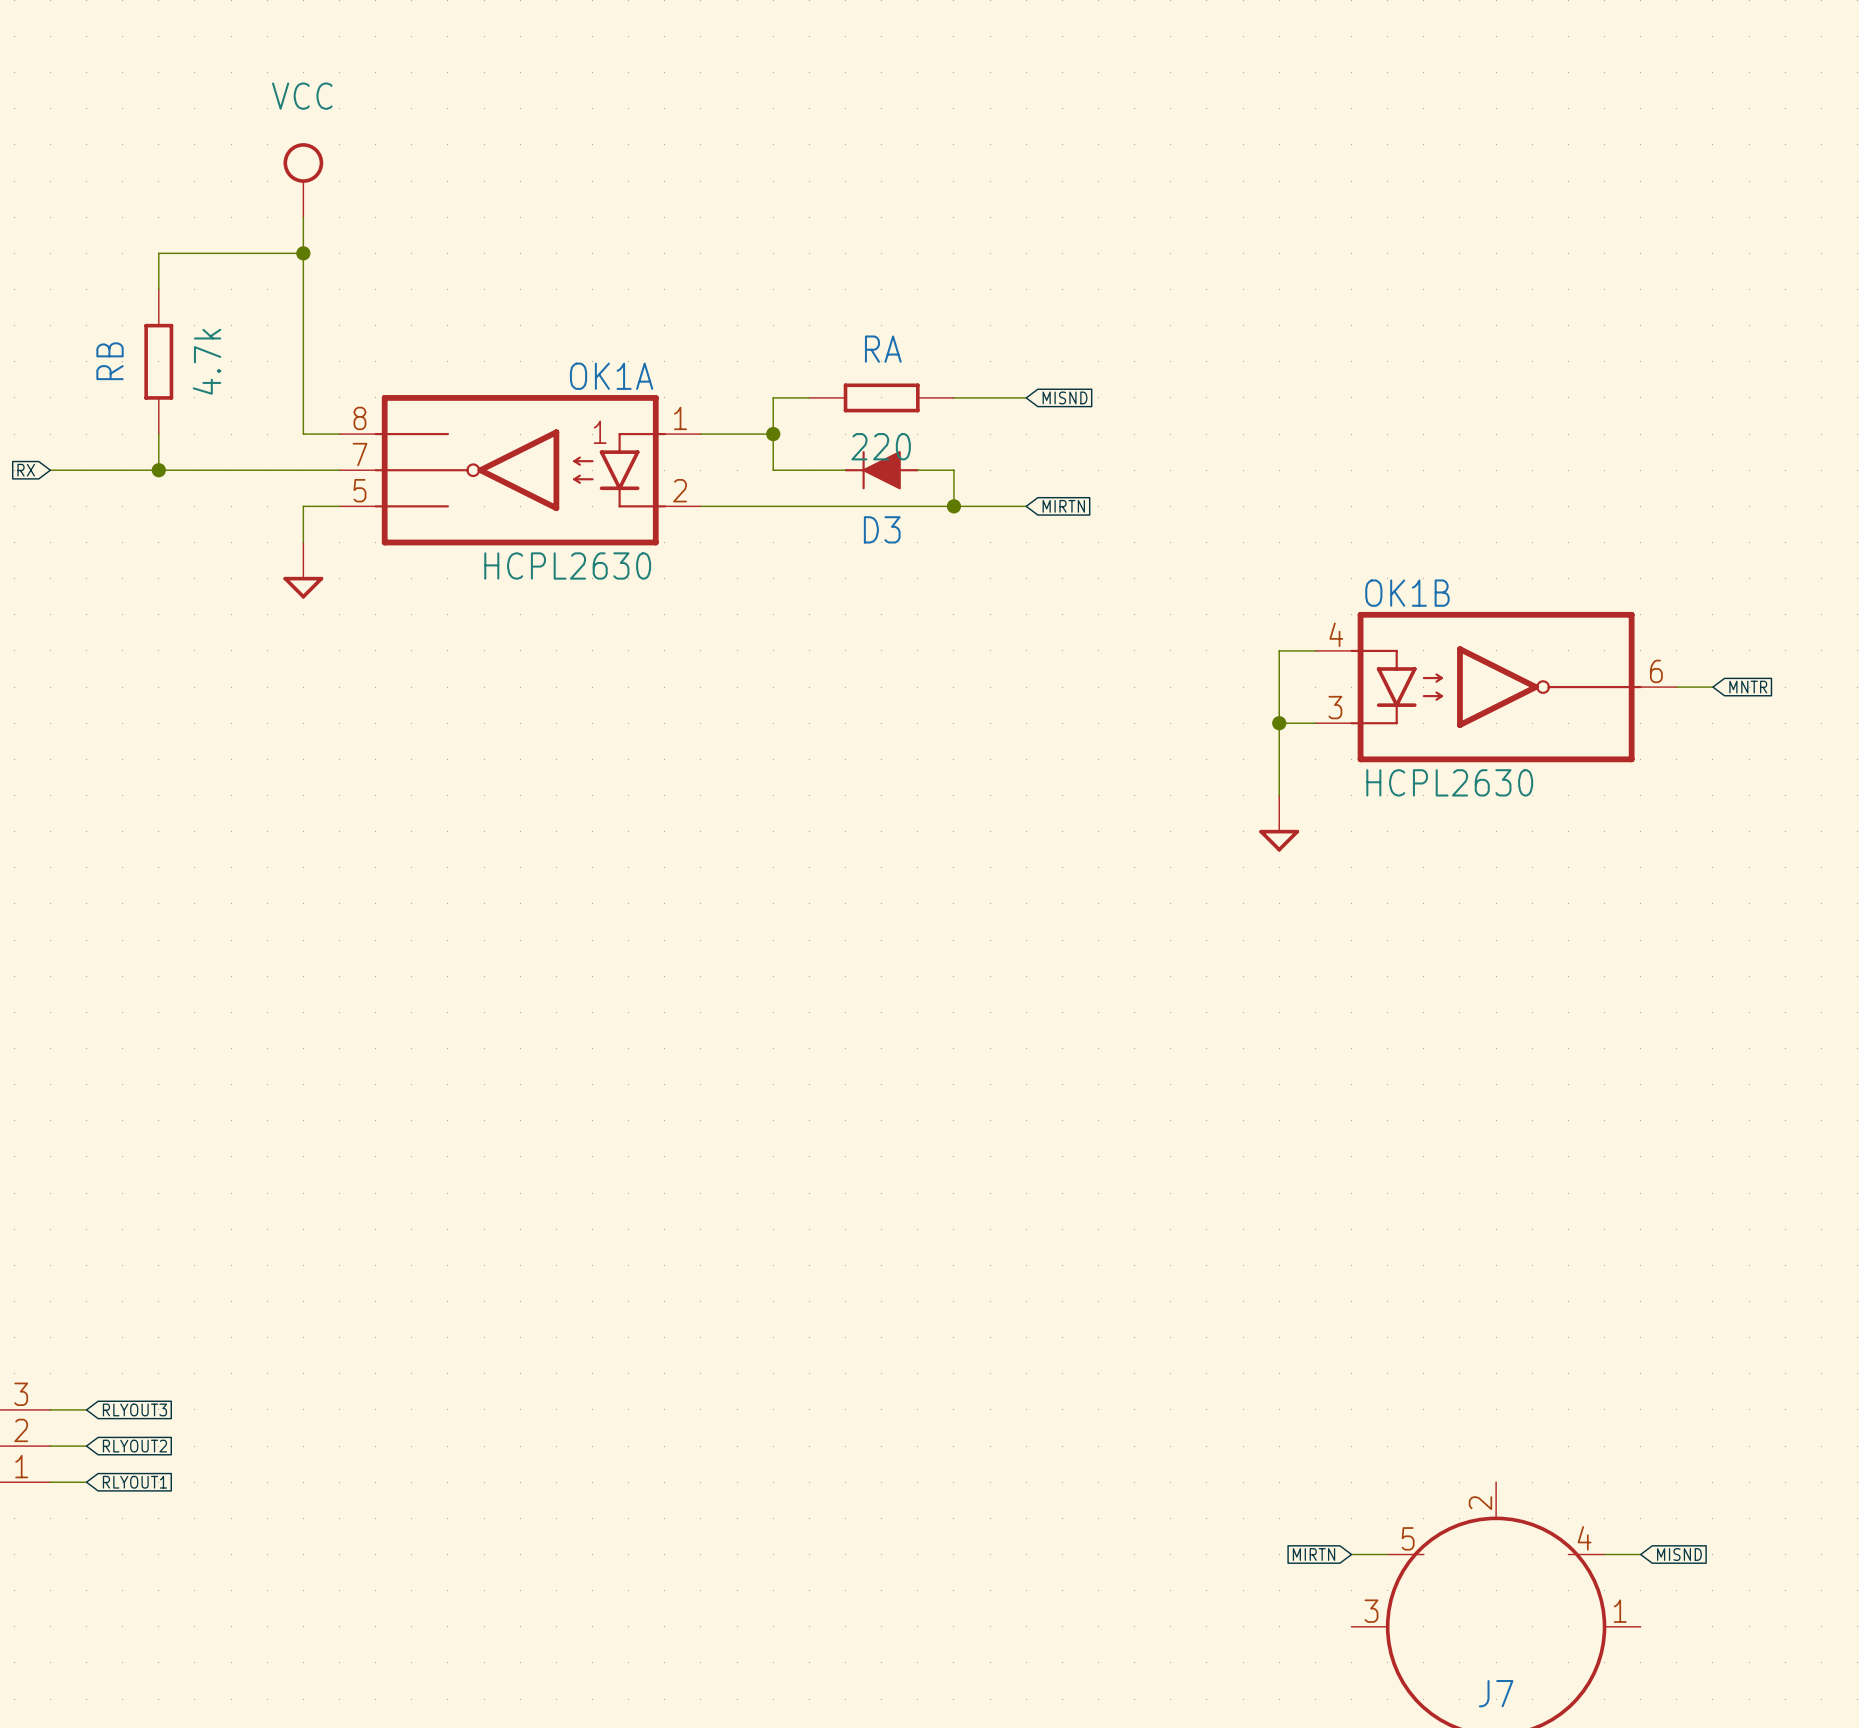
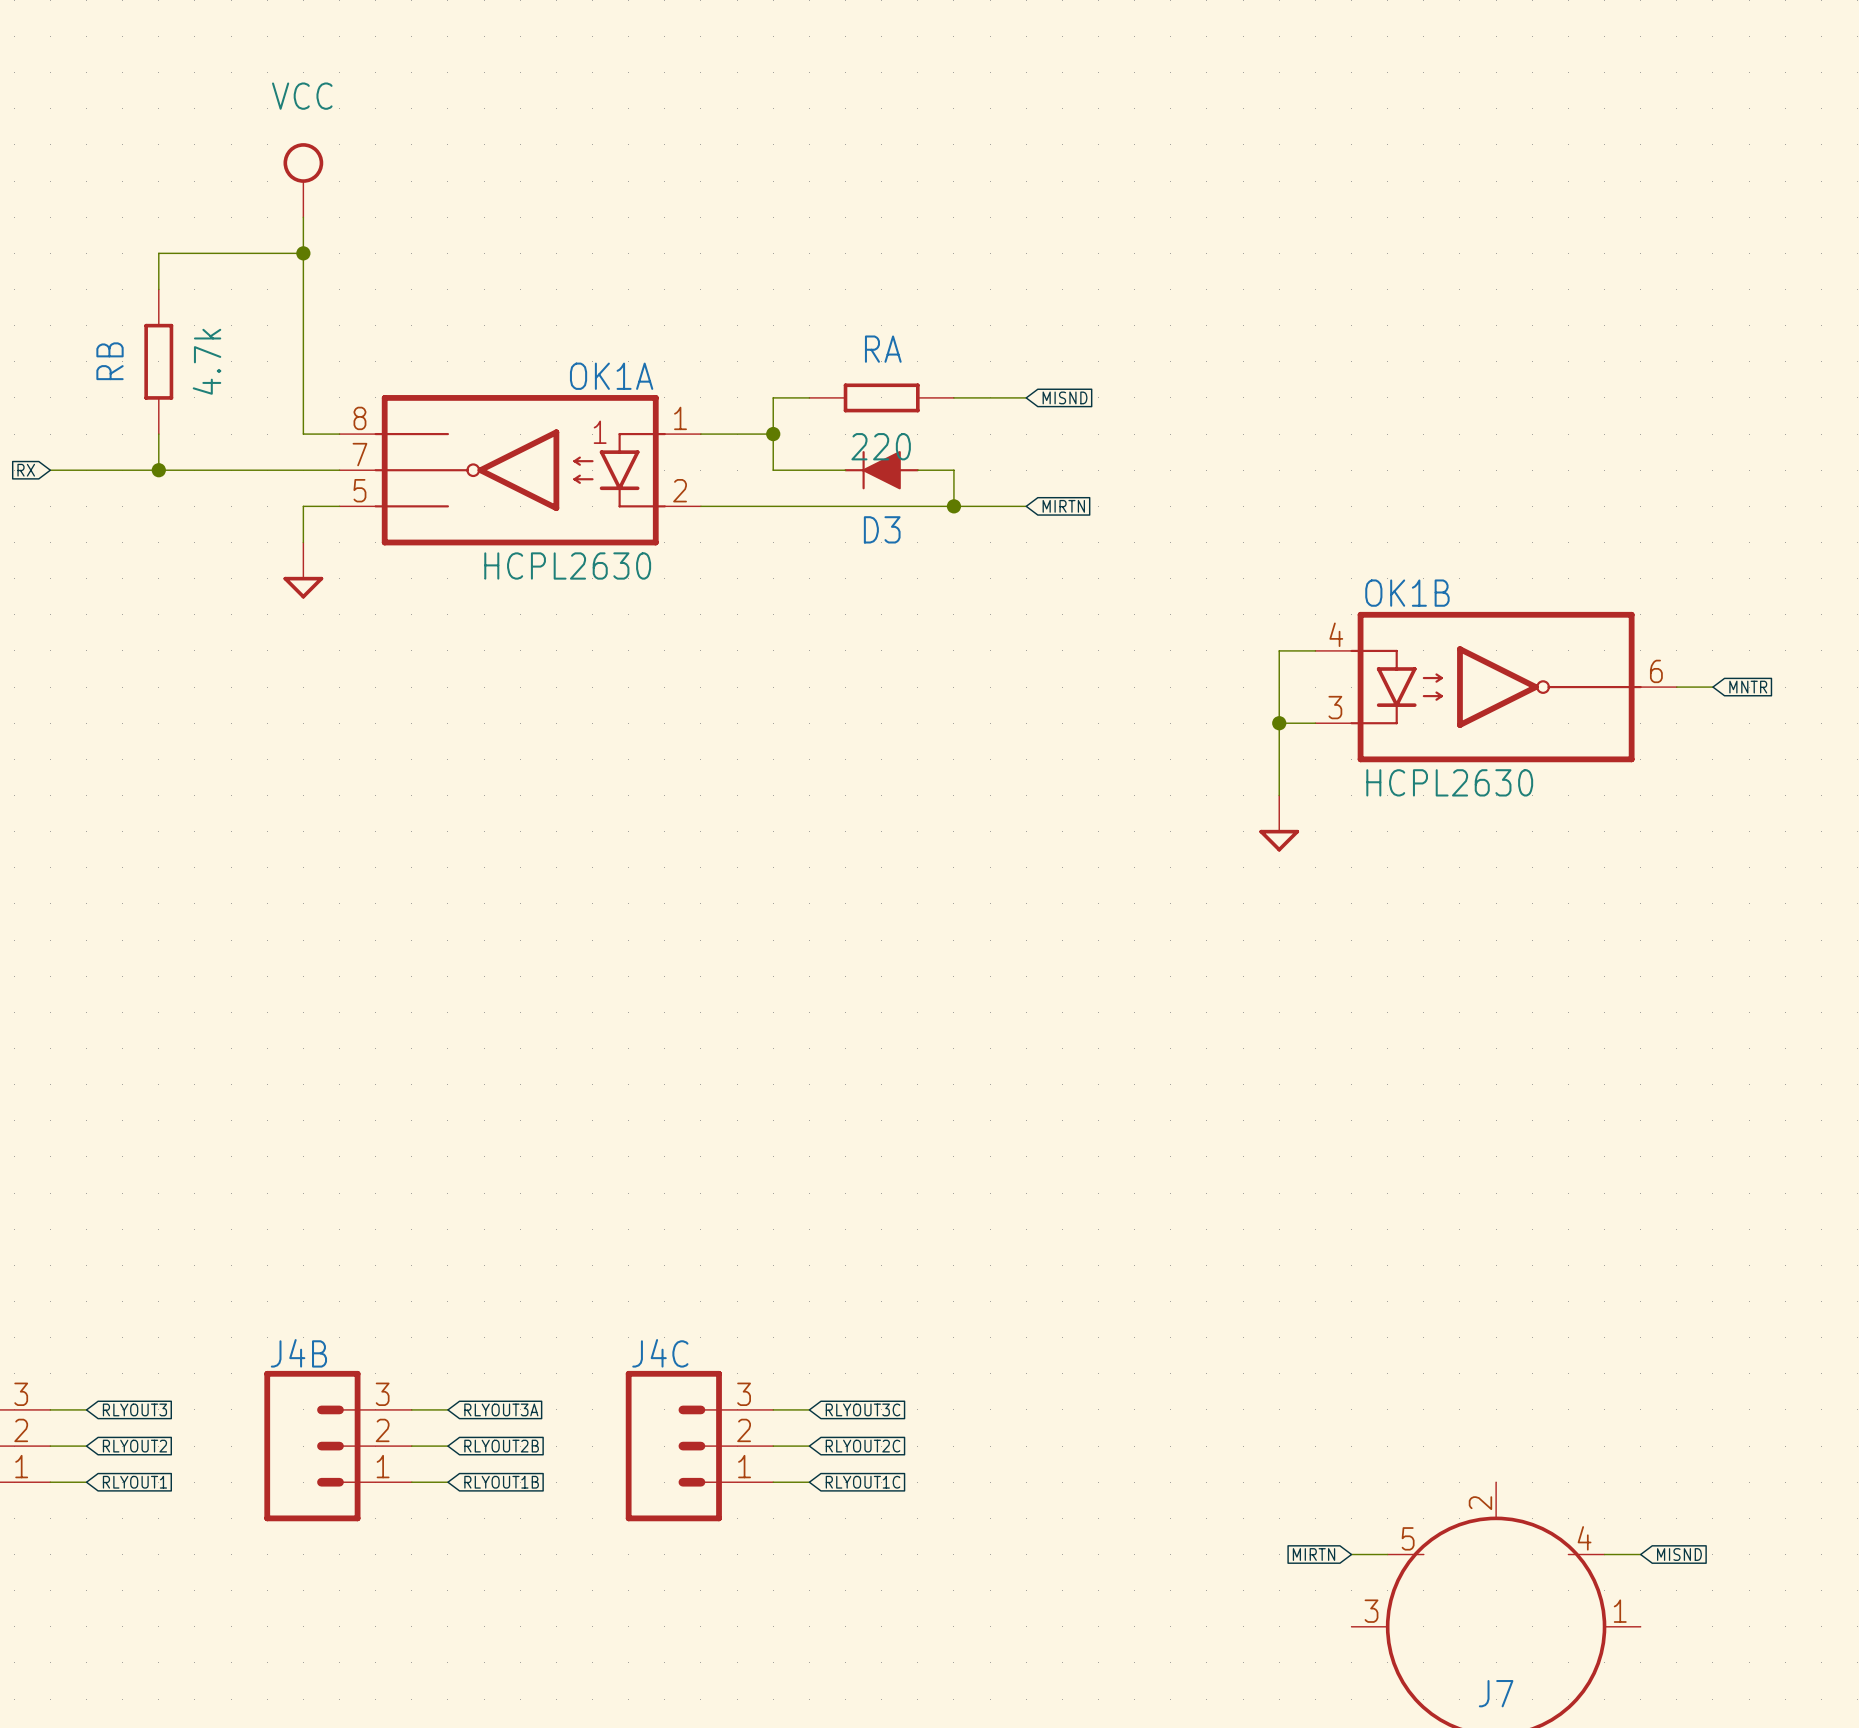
wire: none -> (411, 1409) (447, 1409)
global label: none -> RLYOUT3A (501, 1409)
wire: none -> (773, 1409) (809, 1409)
global label: none -> RLYOUT3C (863, 1409)
J4B: none -> (338, 1446)
wire: none -> (411, 1446) (447, 1446)
global label: none -> RLYOUT2B (501, 1446)
J4C: none -> (699, 1446)
wire: none -> (773, 1446) (809, 1446)
global label: none -> RLYOUT2C (863, 1446)
wire: none -> (411, 1482) (447, 1482)
global label: none -> RLYOUT1B (501, 1482)
wire: none -> (773, 1482) (809, 1482)
global label: none -> RLYOUT1C (863, 1482)

